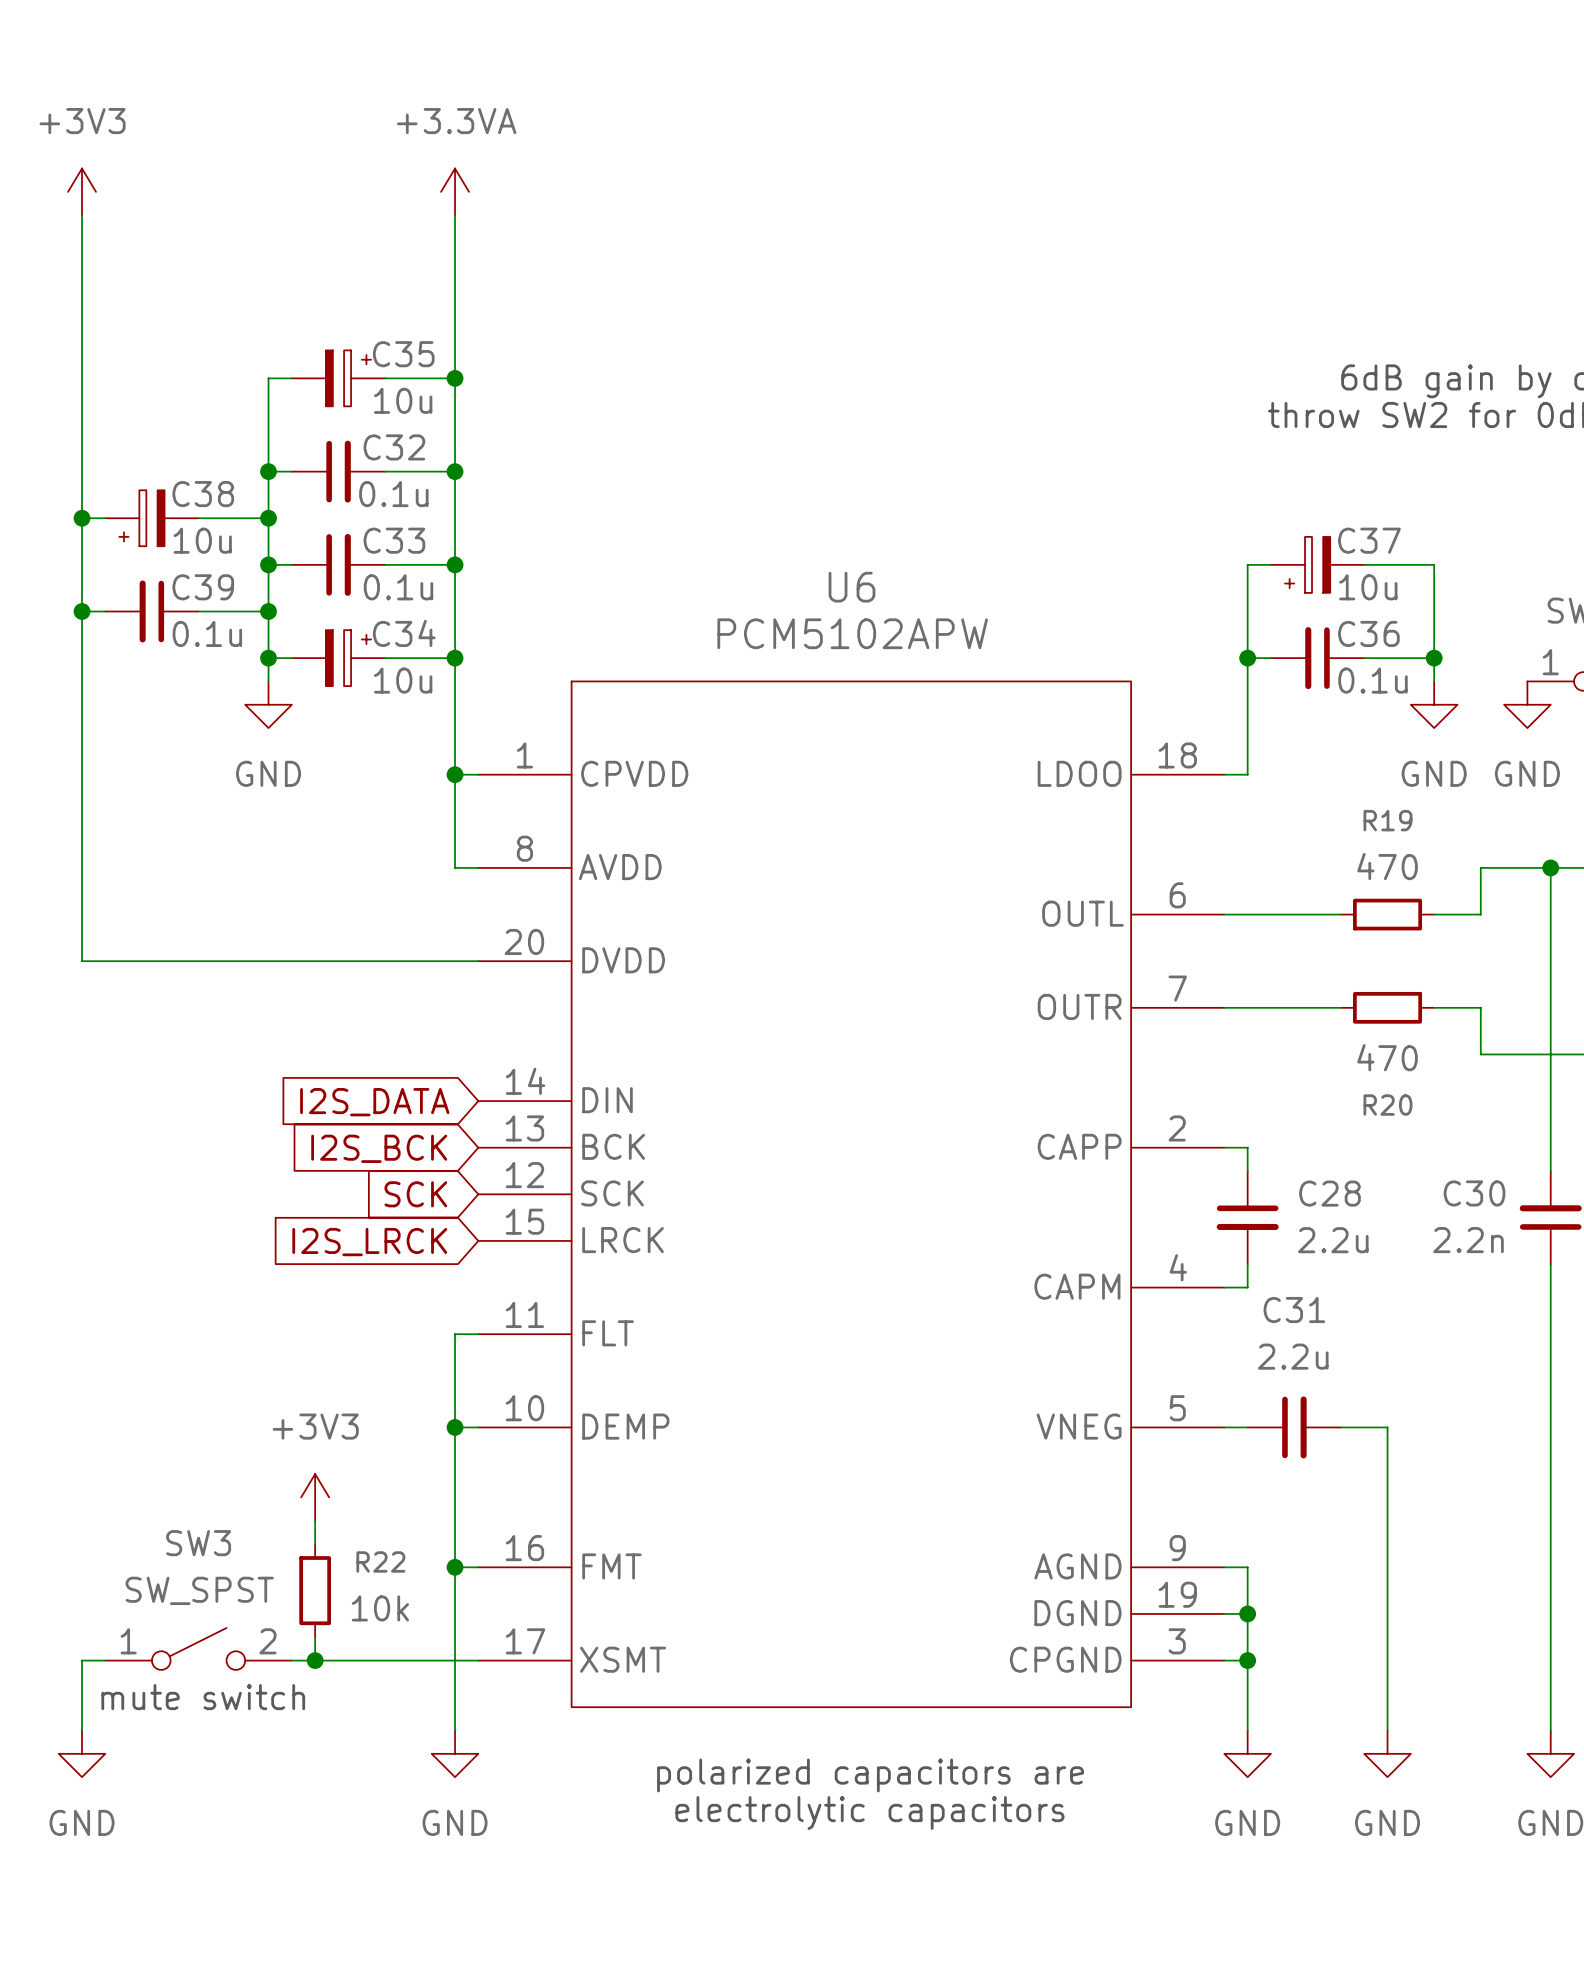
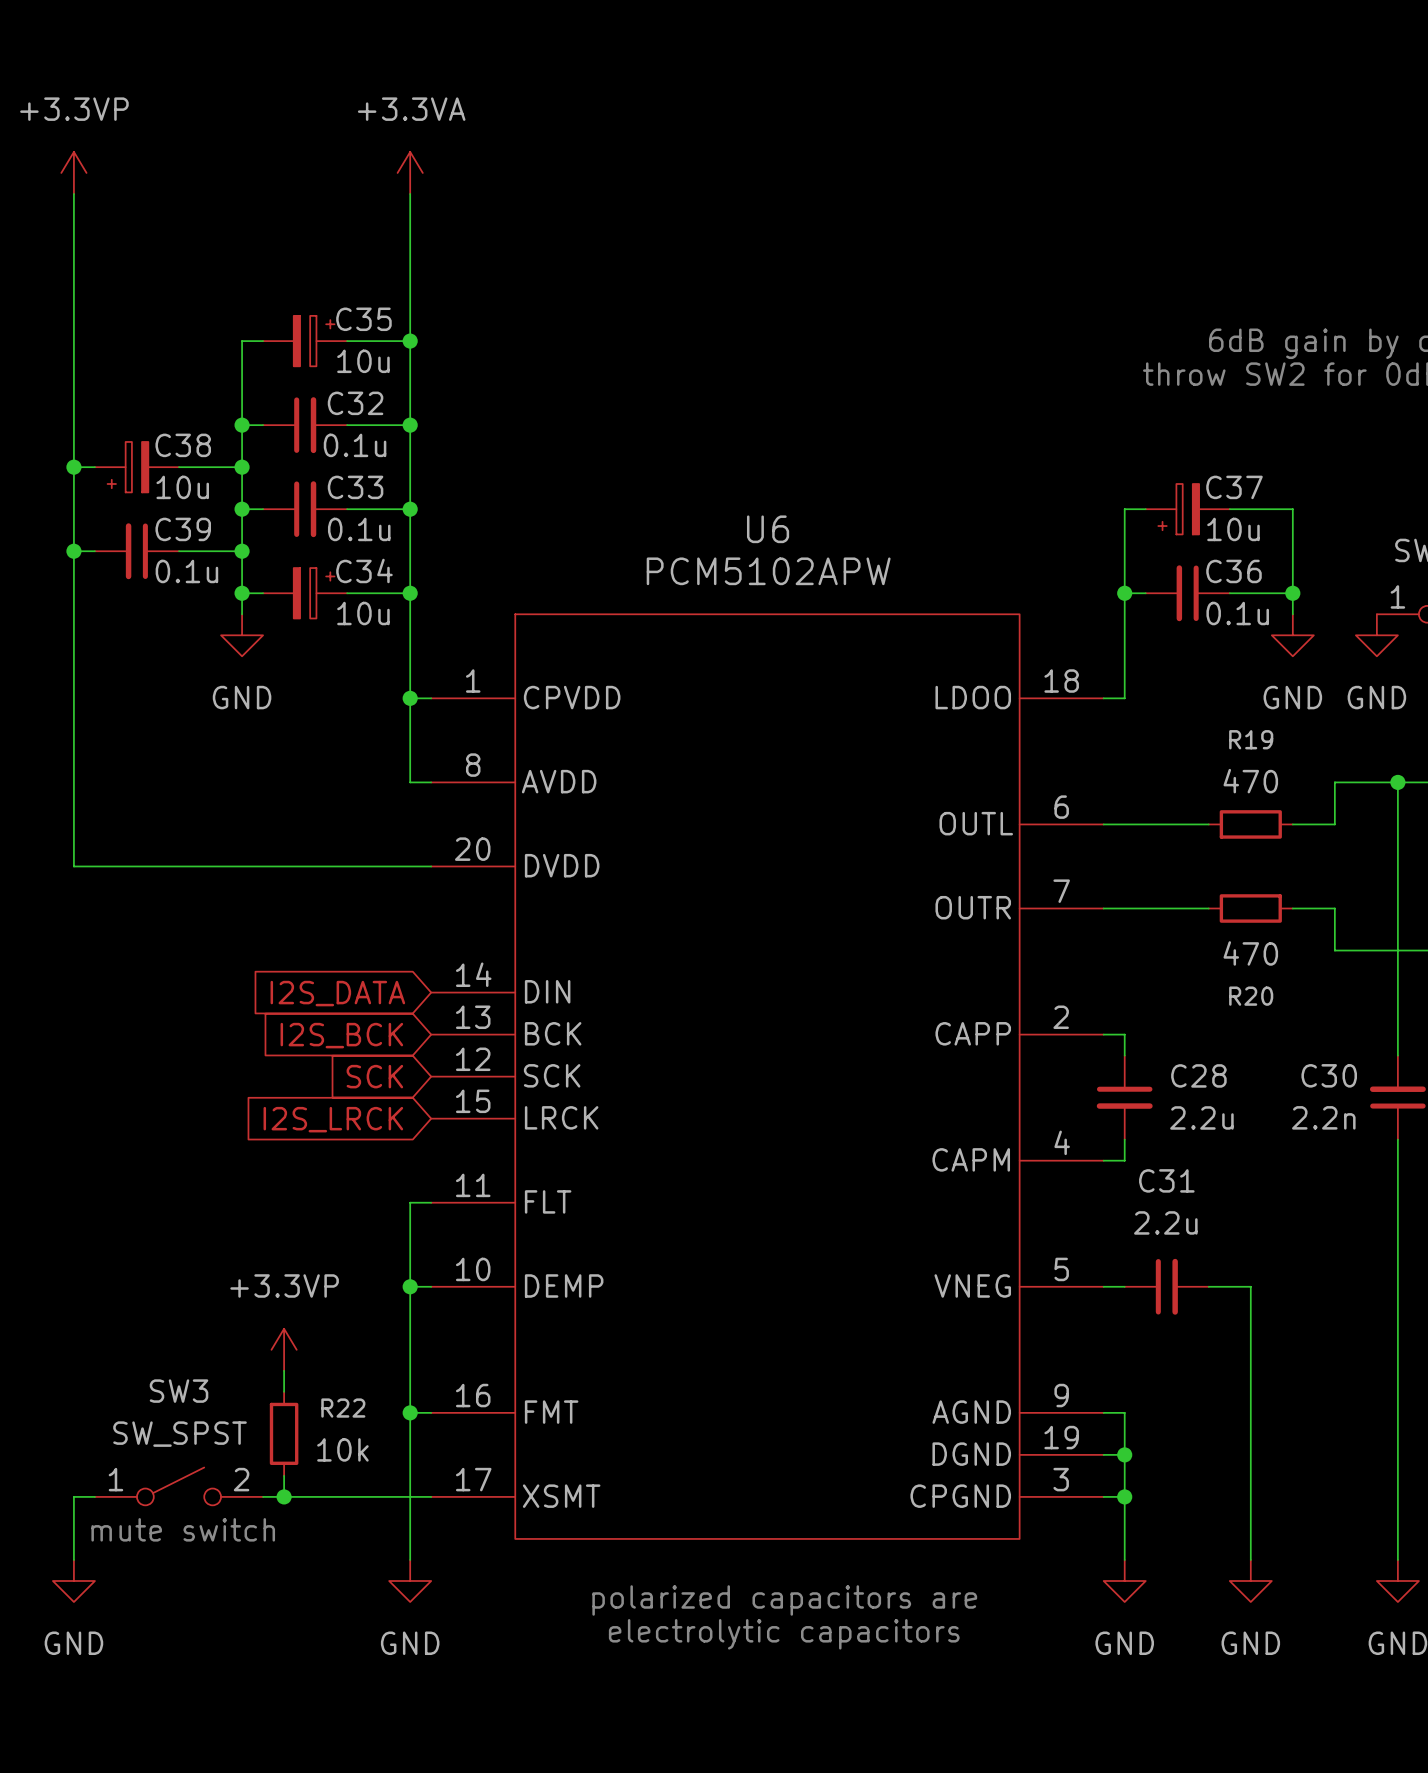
power symbol: +3V3 (82, 191) -> +3.3VP (73, 172)
power symbol: +3V3 (315, 1497) -> +3.3VP (284, 1349)

